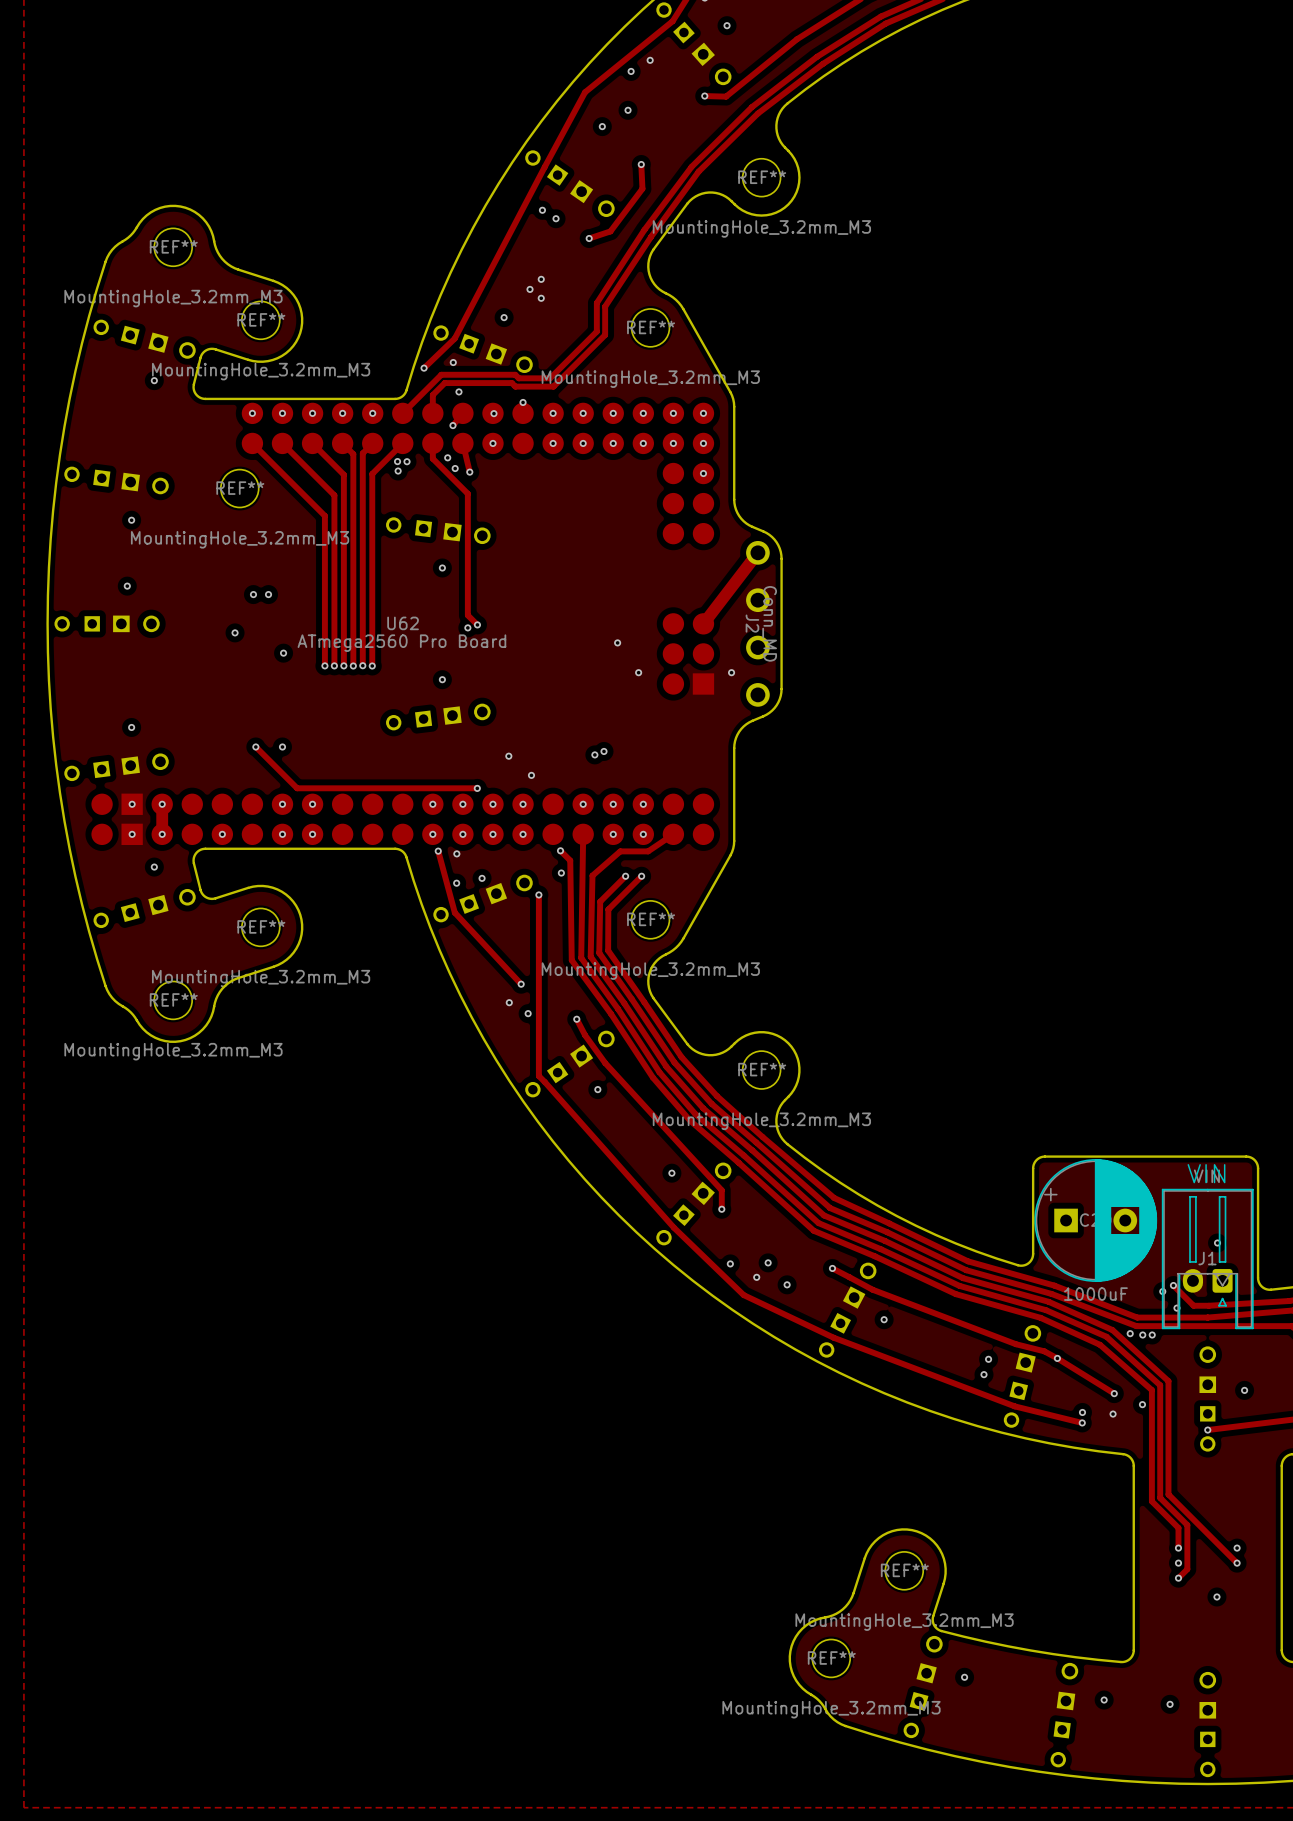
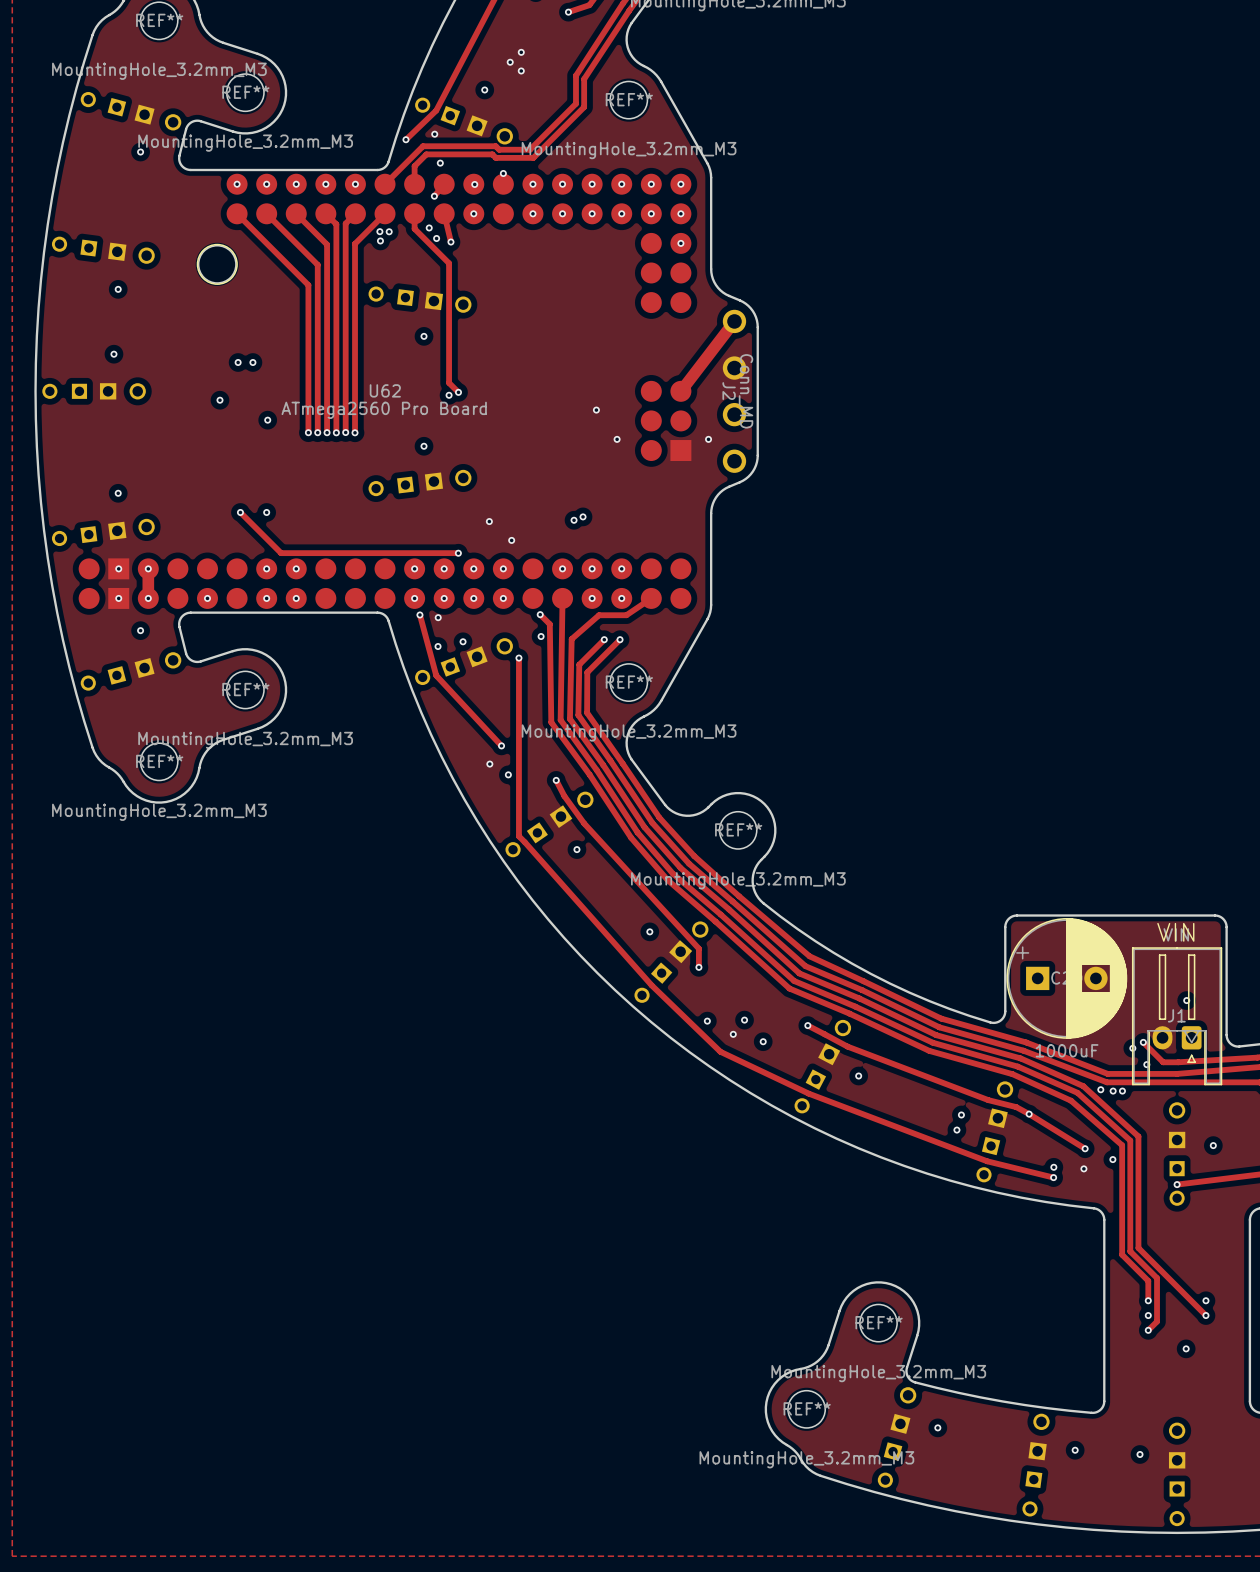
U62 footprint: [91, 402, 715, 846] -> [78, 173, 692, 609]
REF**: MountingHole_3.2mm_M3 (239, 488) -> none

